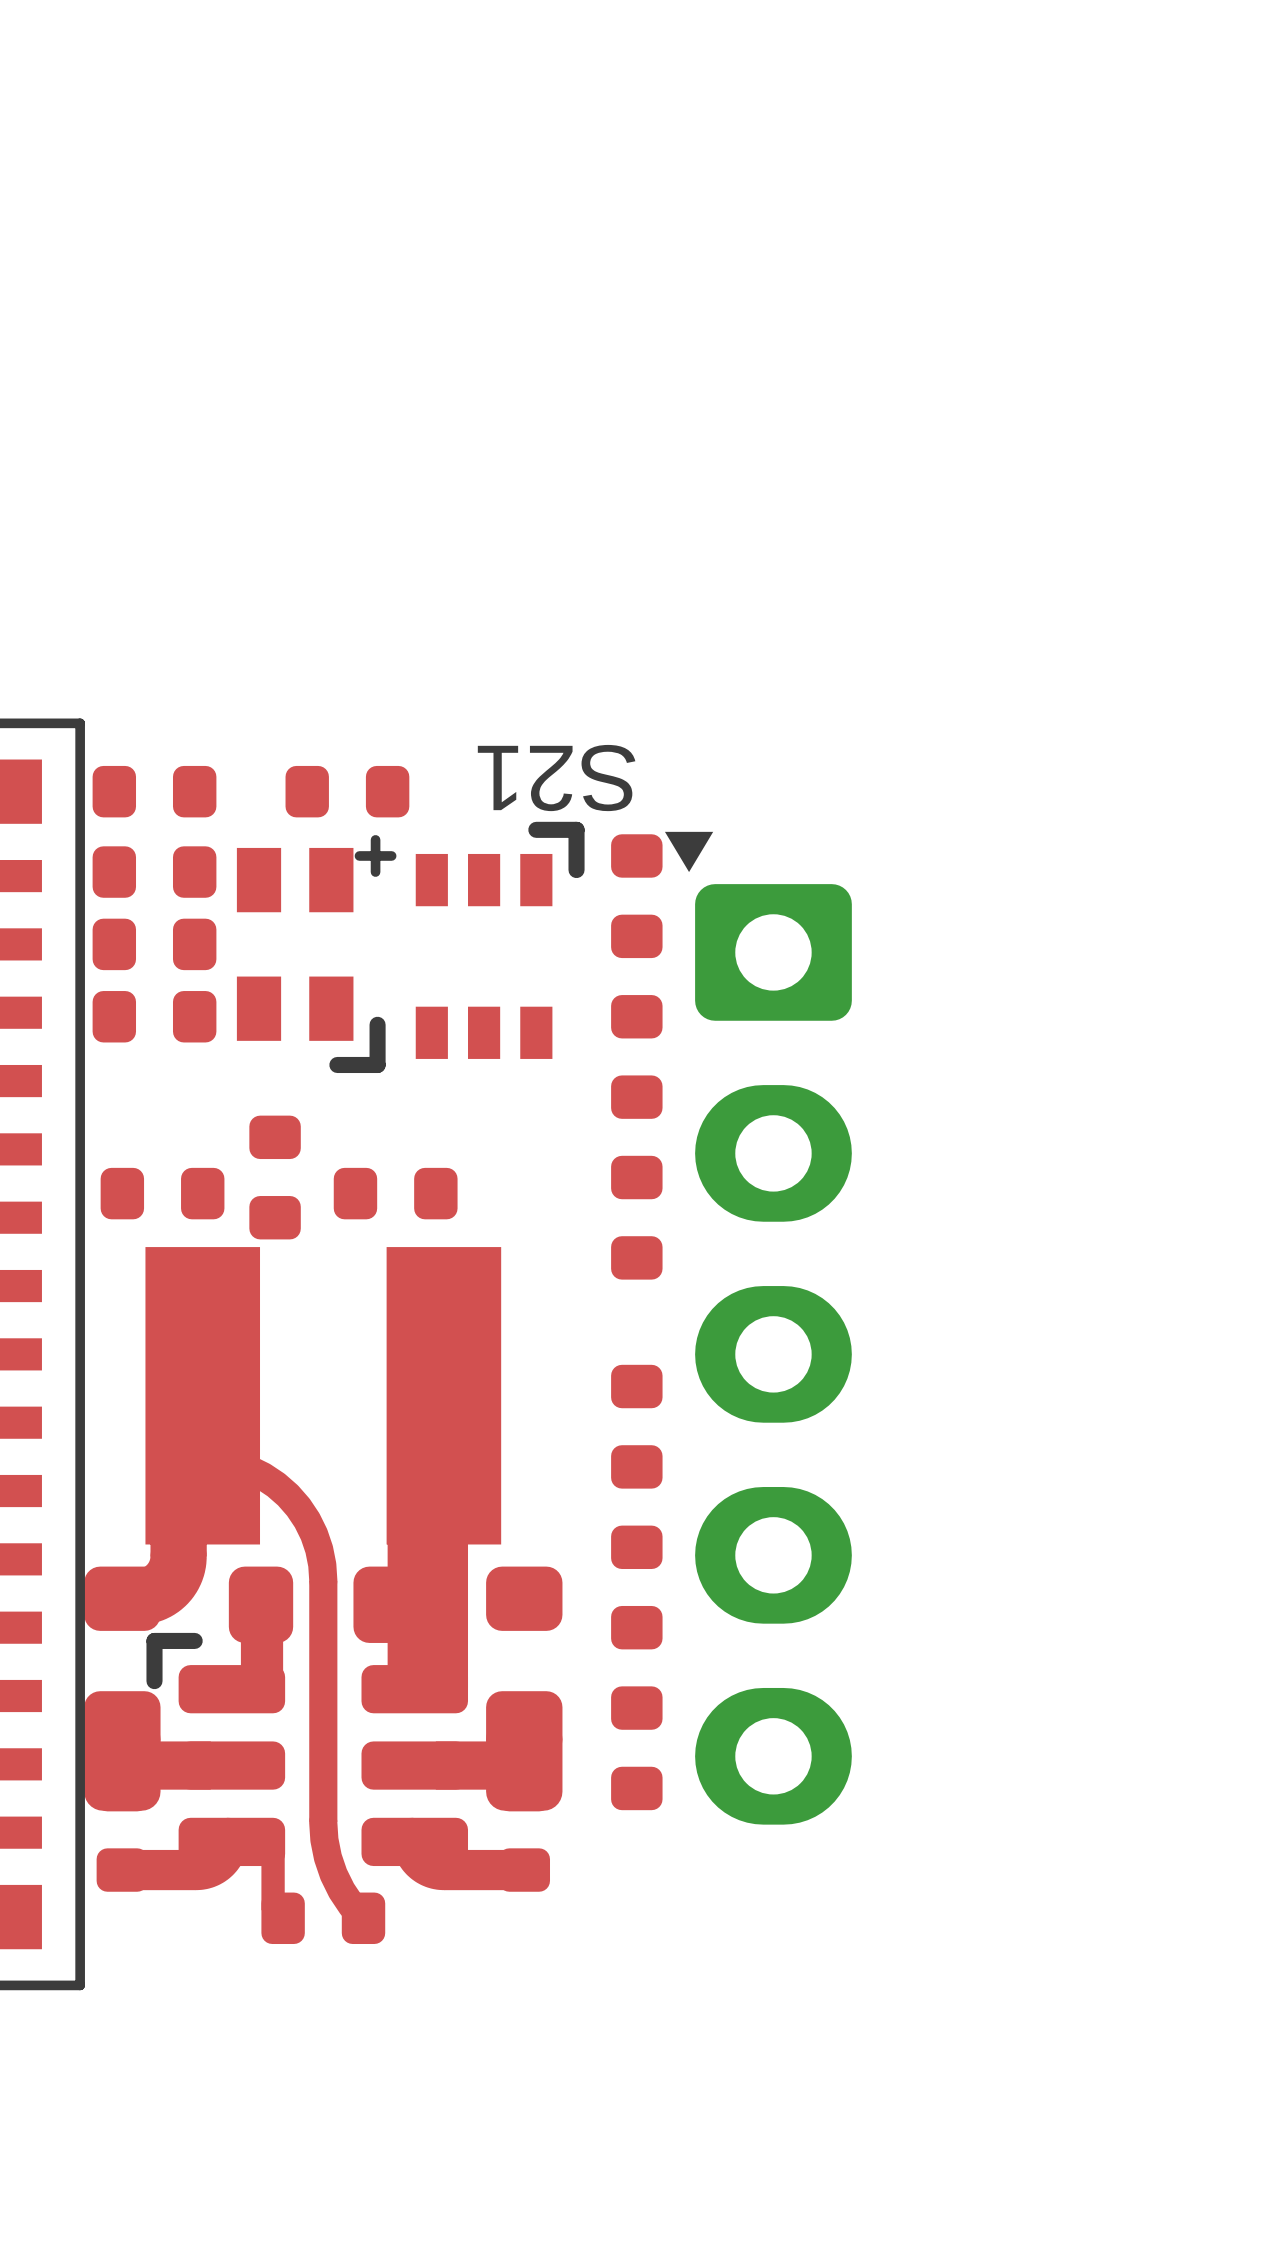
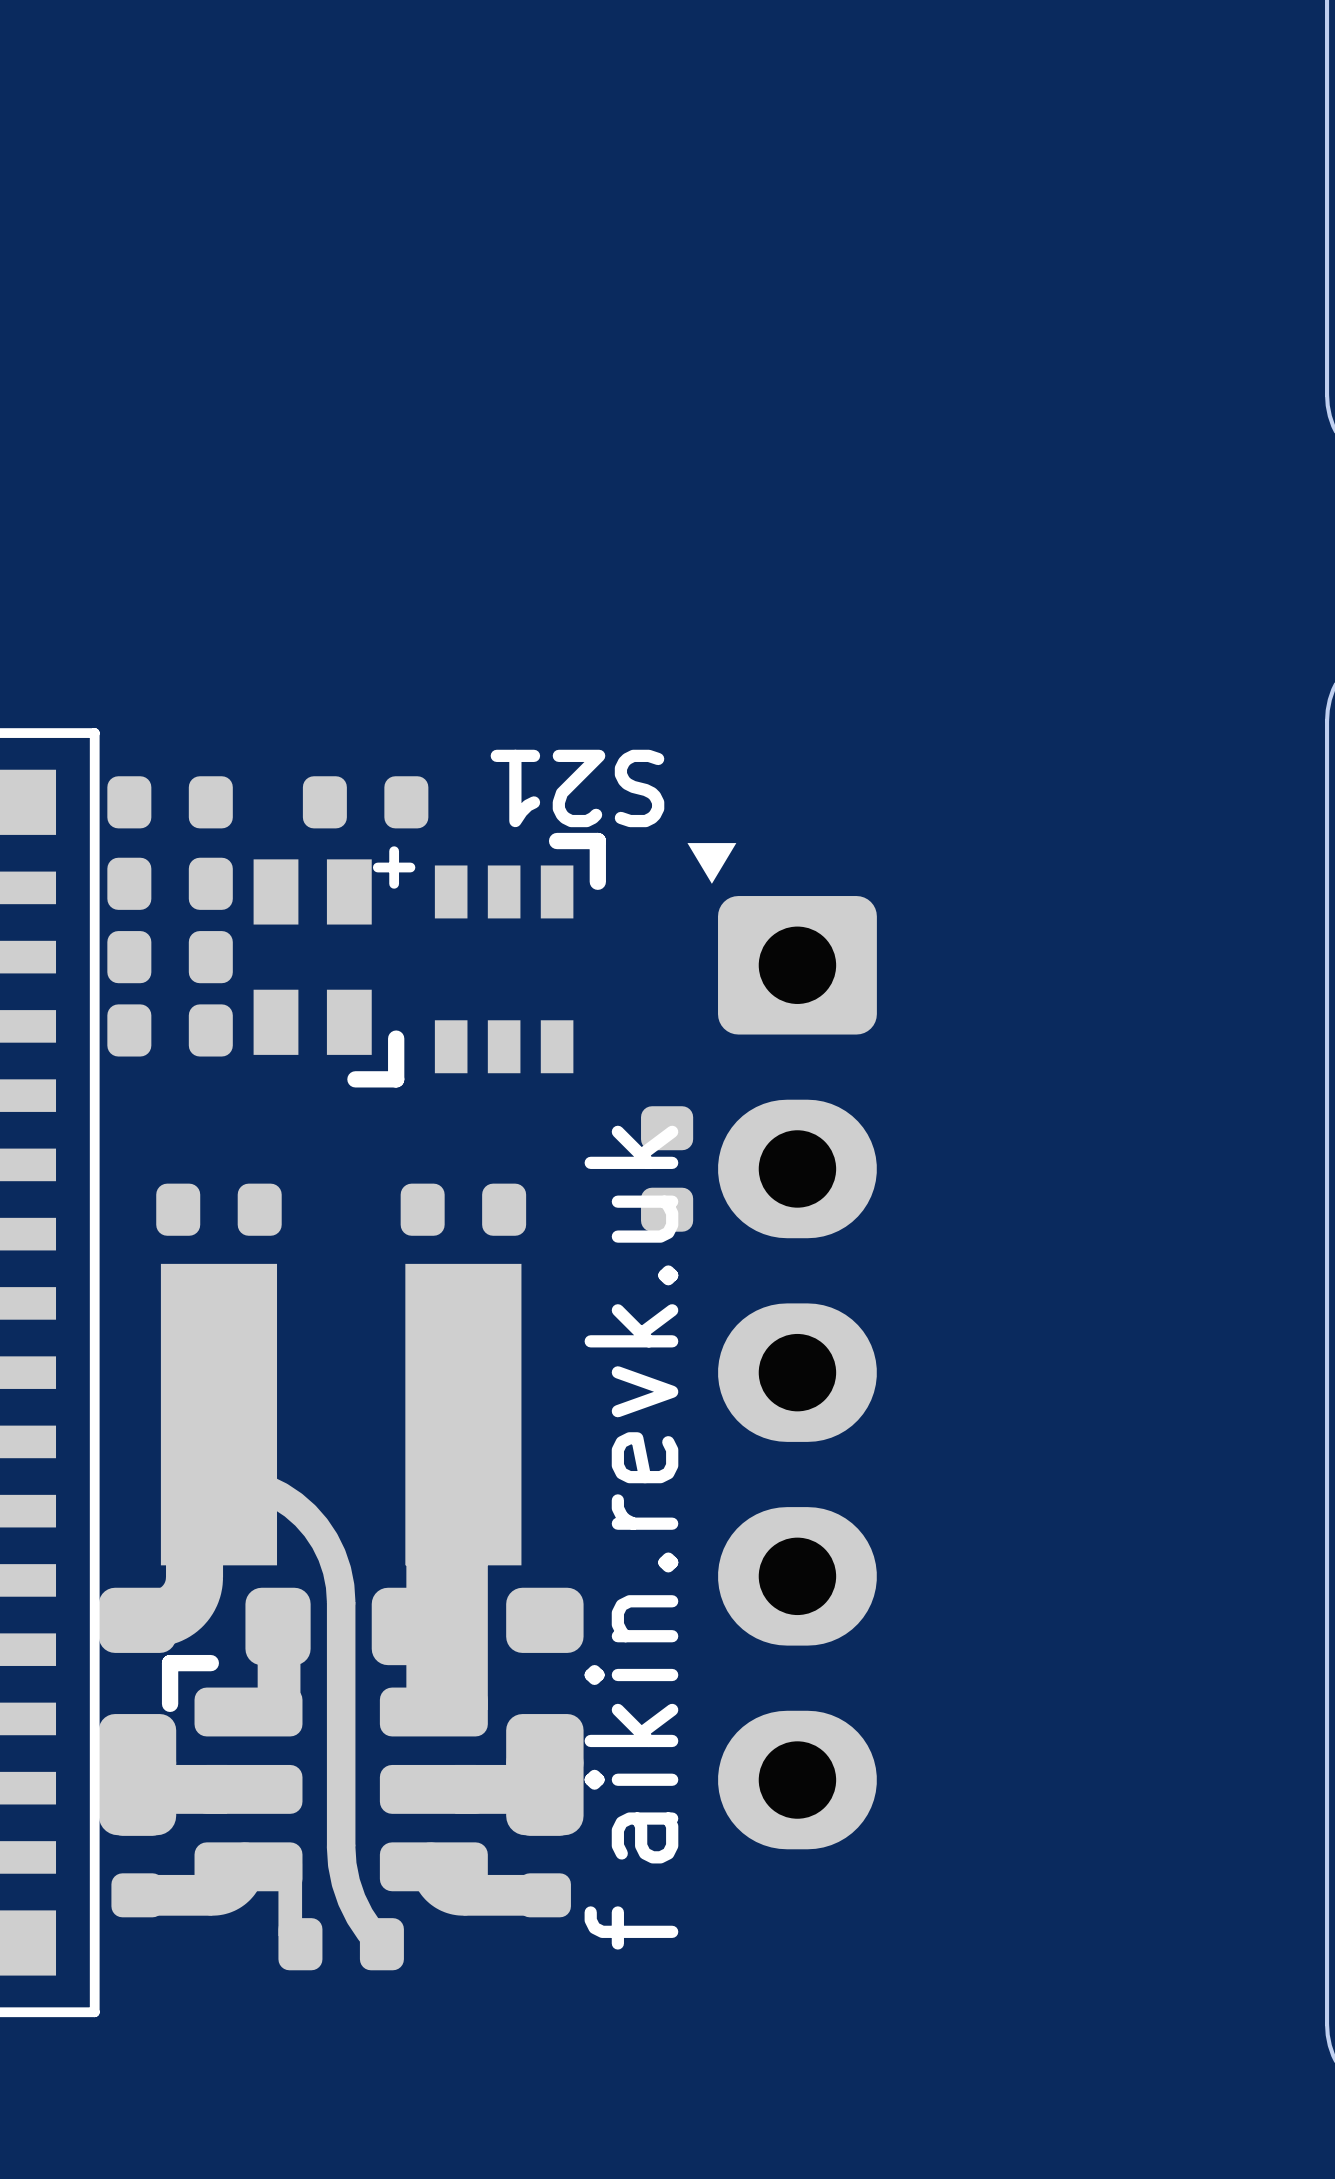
part: (636, 896) -> none
part: (636, 1056) -> none
part: none -> (667, 1168)
part: (275, 1177) -> none
part: (162, 1193) -> none
part: none -> (218, 1209)
part position: (395, 1193) -> (463, 1209)
part: (636, 1217) -> none
part: (636, 1426) -> none
text: none -> aikin.revk.uk (631, 1494)
part: (636, 1587) -> none
part: (636, 1748) -> none
text: none -> f (631, 1927)

